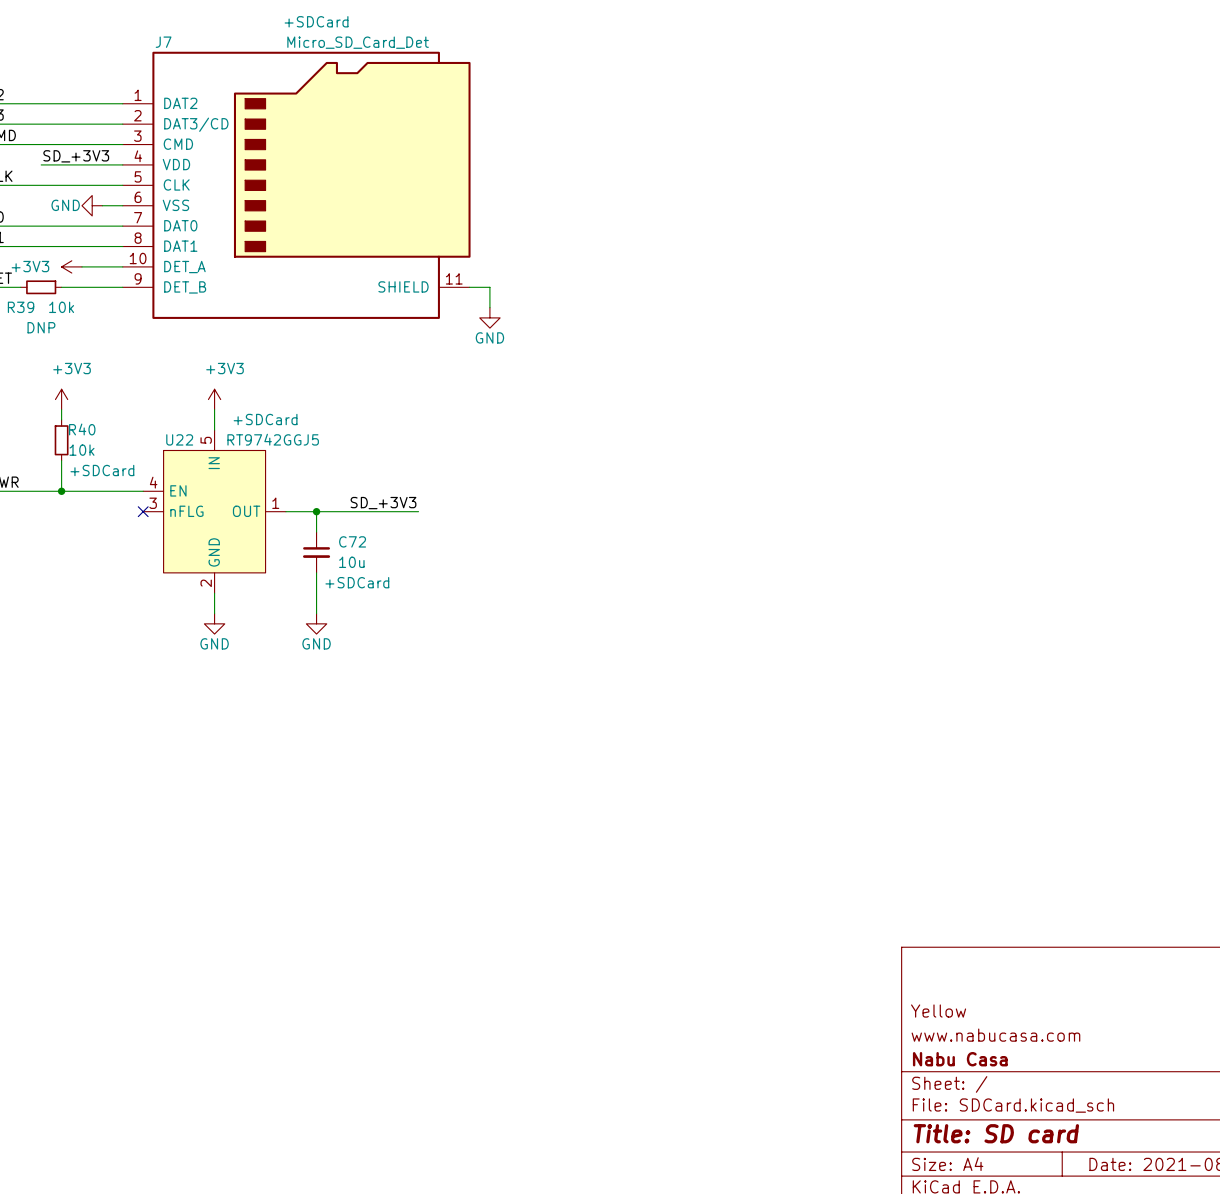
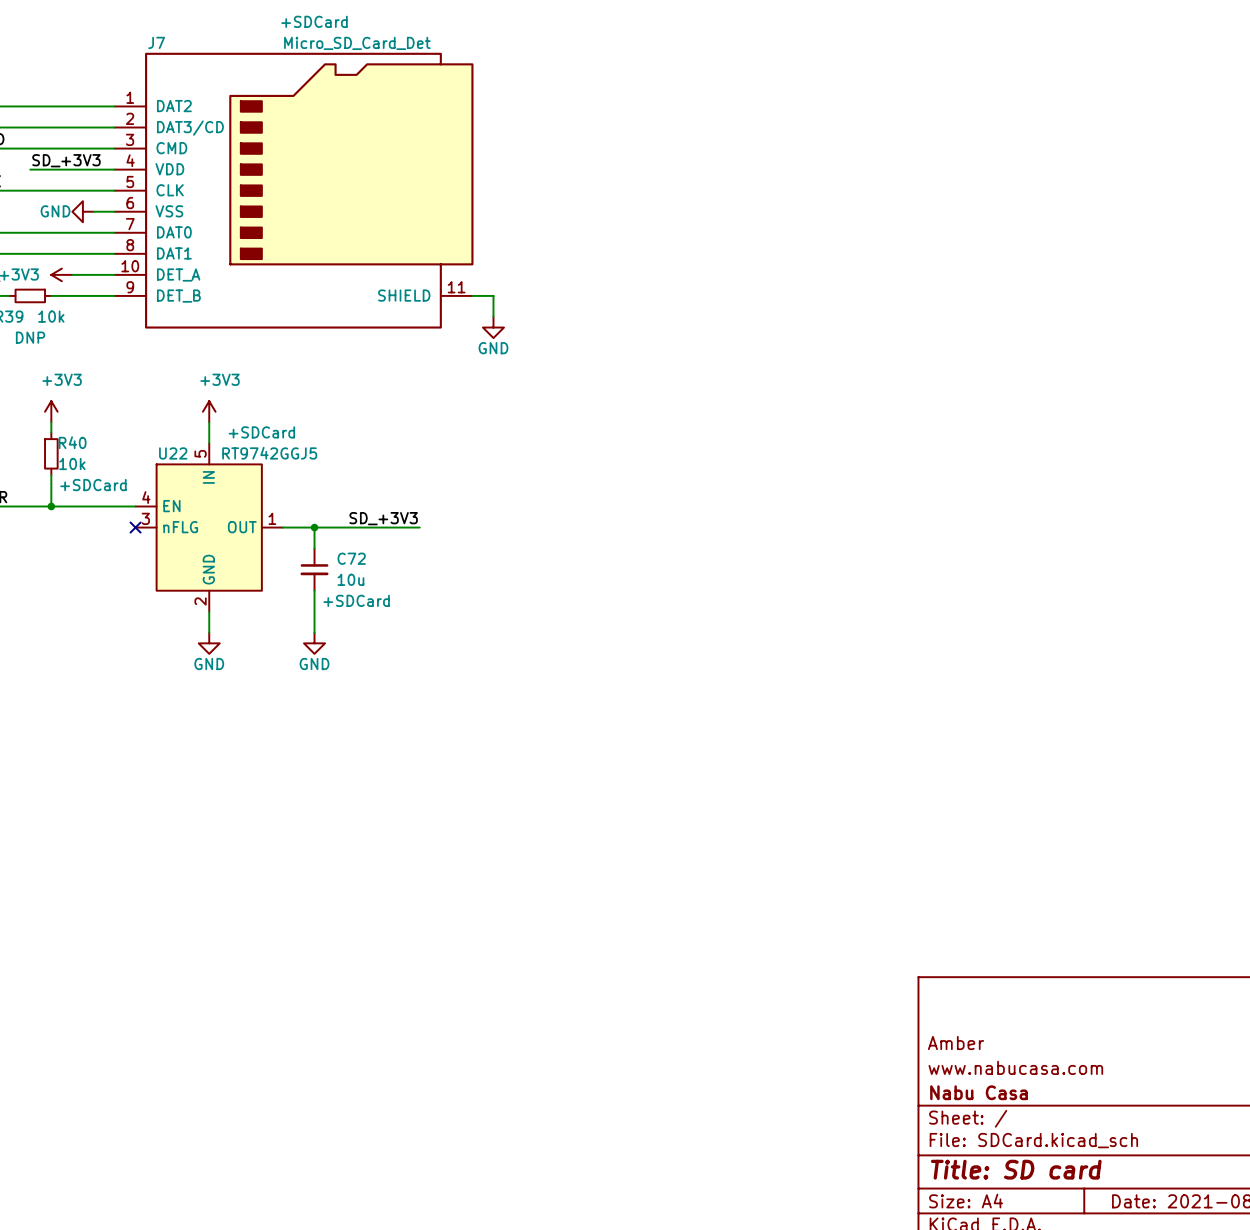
title block: Yellow (938, 1011) -> Amber (956, 1043)

